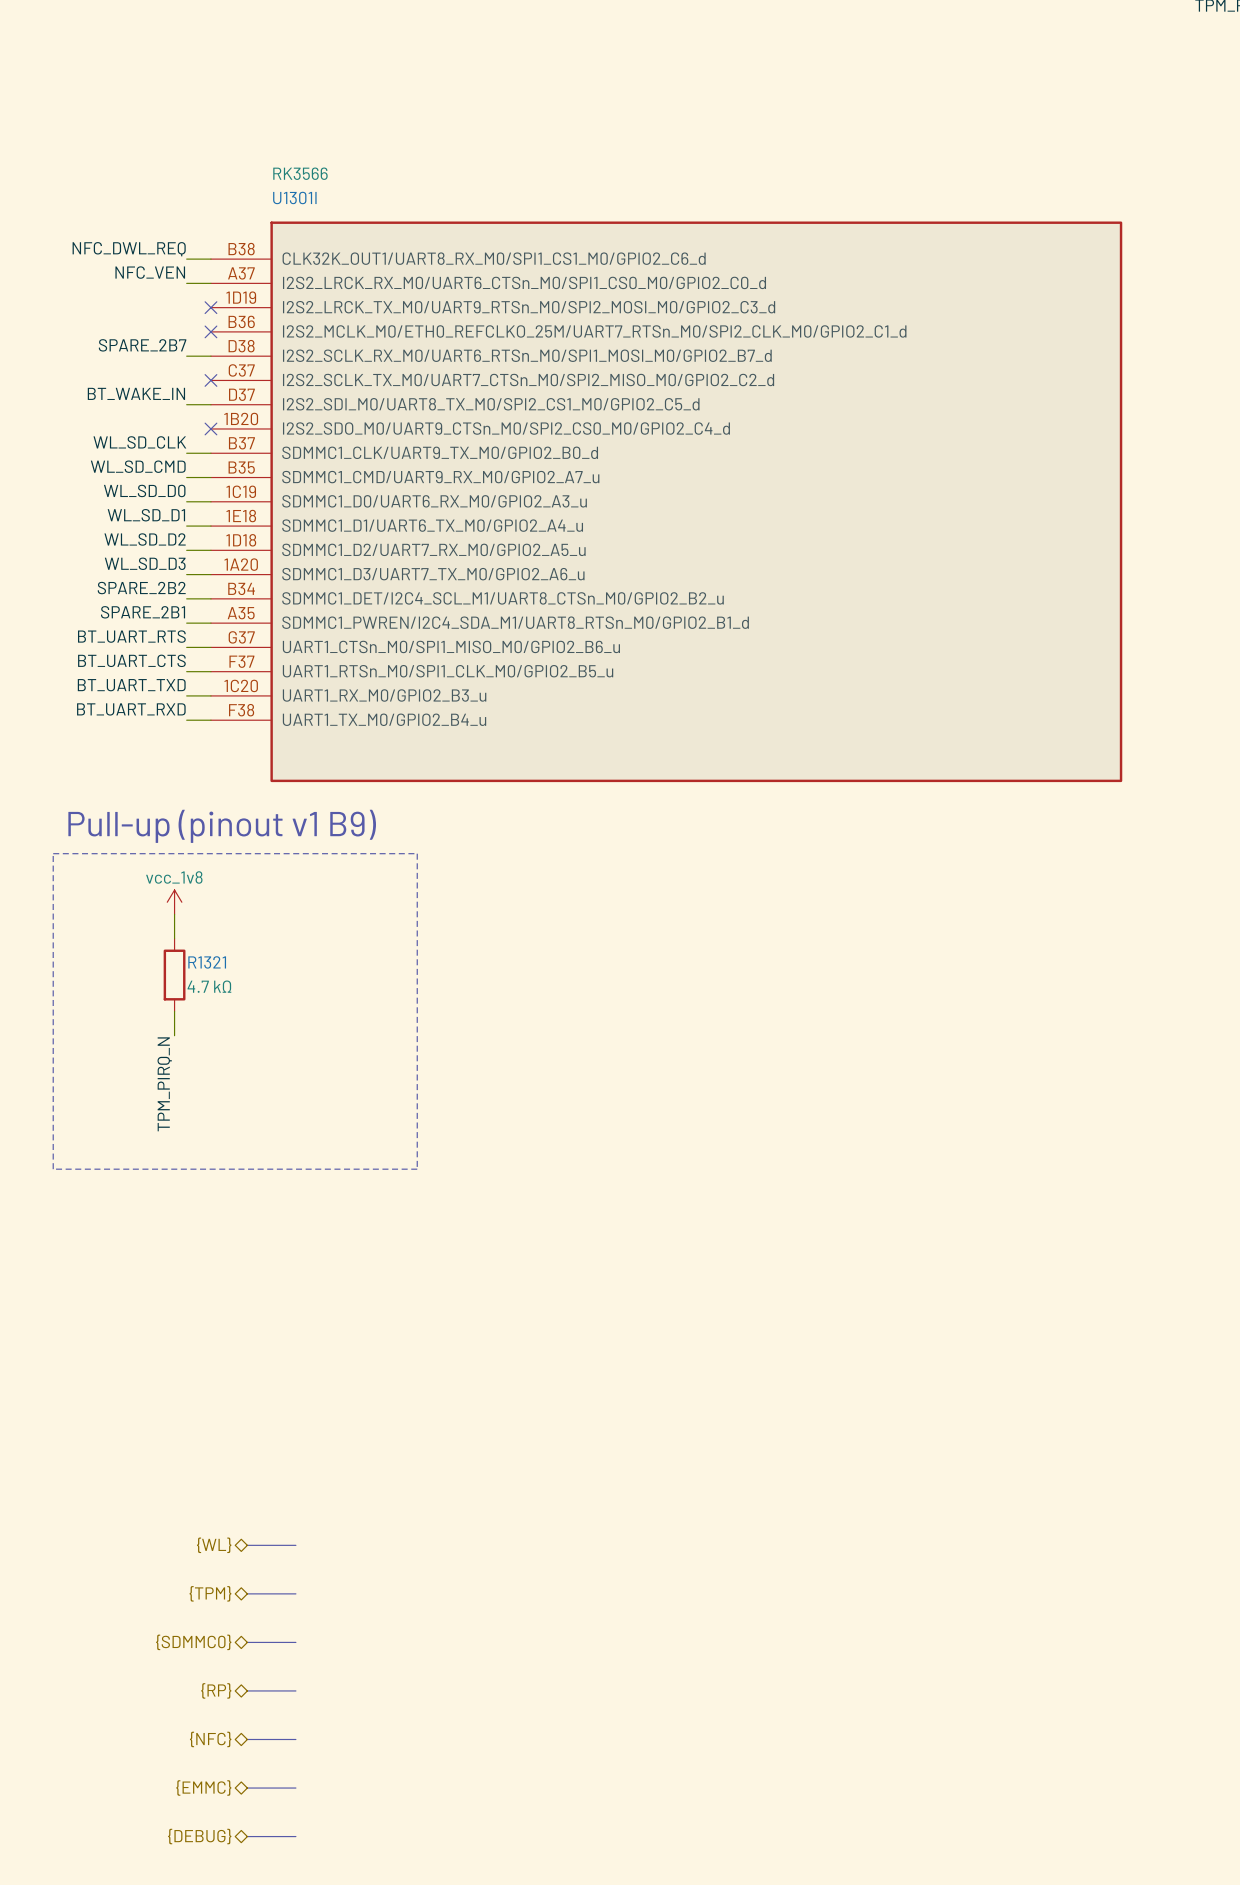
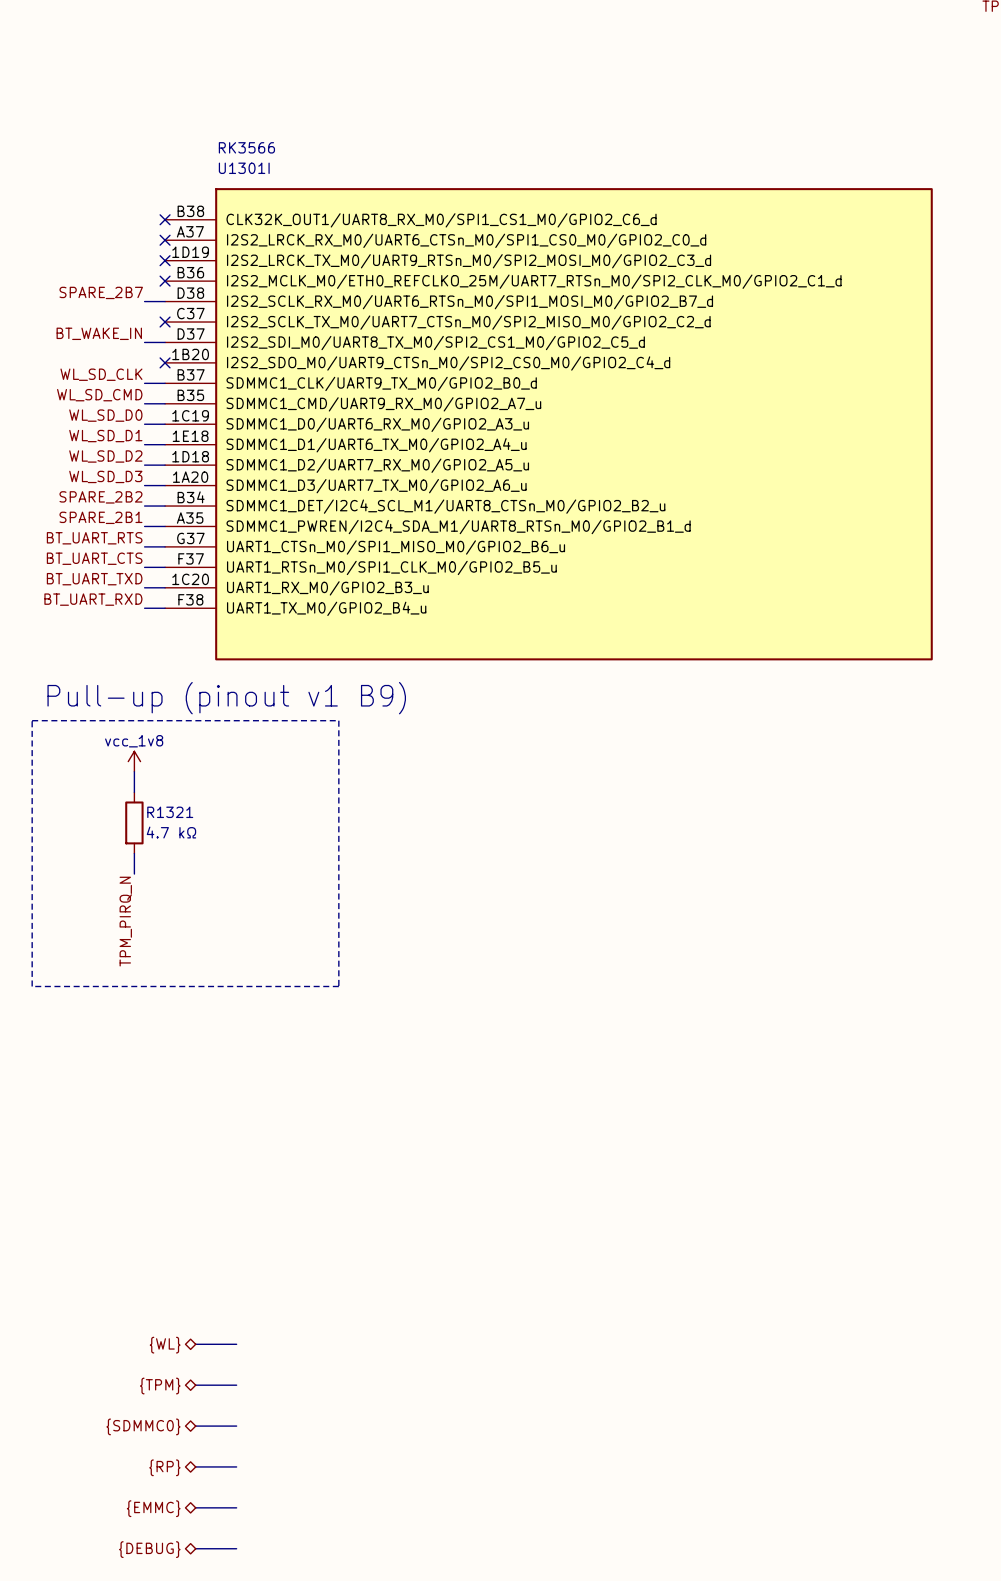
label: NFC_DWL_REQ (129, 249) -> none
wire: (186, 259) (210, 259) -> none
no-connect mark: none -> (165, 219)
label: NFC_VEN (150, 272) -> none
wire: (186, 283) (210, 283) -> none
no-connect mark: none -> (165, 240)
hierarchical label: {WL} (214, 1545) -> none
bus: (247, 1545) (295, 1545) -> none
hierarchical label: {TPM} (210, 1593) -> {WL} (165, 1345)
hierarchical label: {SDMMC0} (193, 1642) -> {TPM} (160, 1386)
hierarchical label: {RP} (216, 1690) -> {SDMMC0} (143, 1426)
hierarchical label: {NFC} (210, 1739) -> {RP} (164, 1467)

